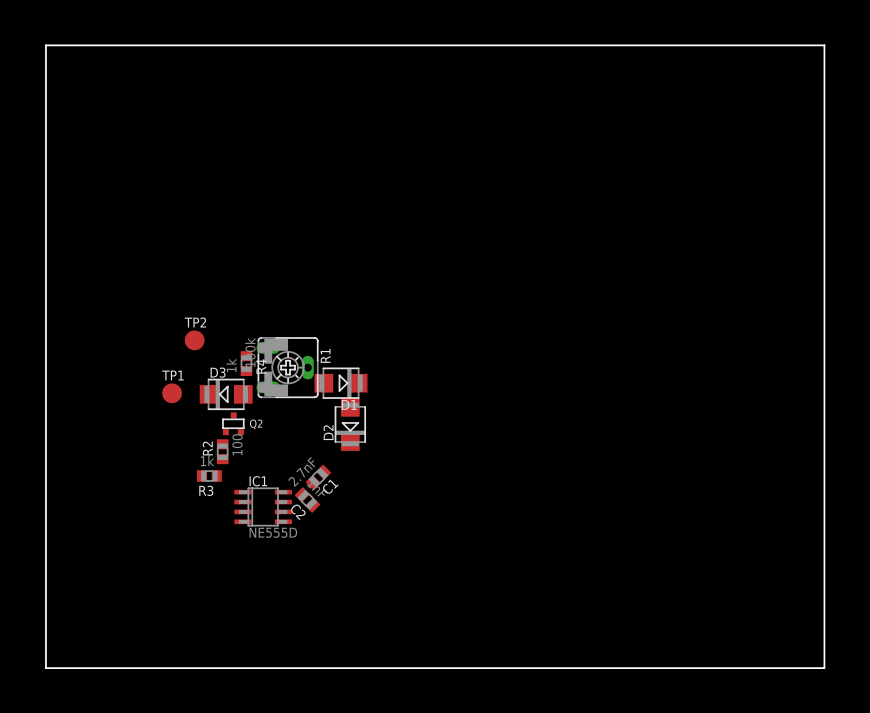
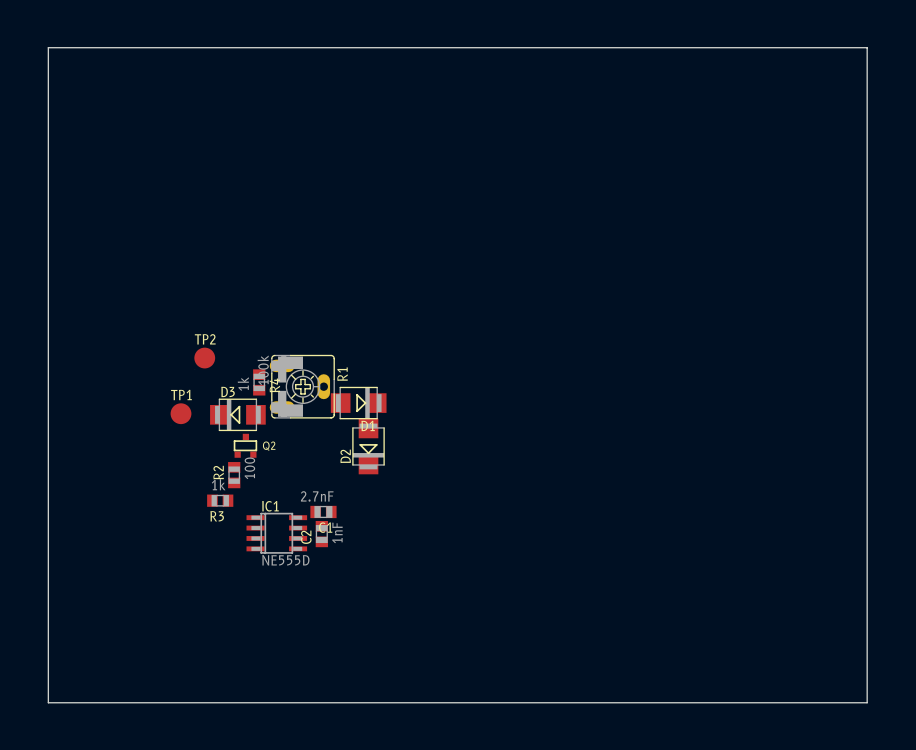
C1 rotation: 0° (318, 477) -> 45° clockwise (323, 511)
C2 rotation: 0° (307, 499) -> 45° clockwise (321, 534)

